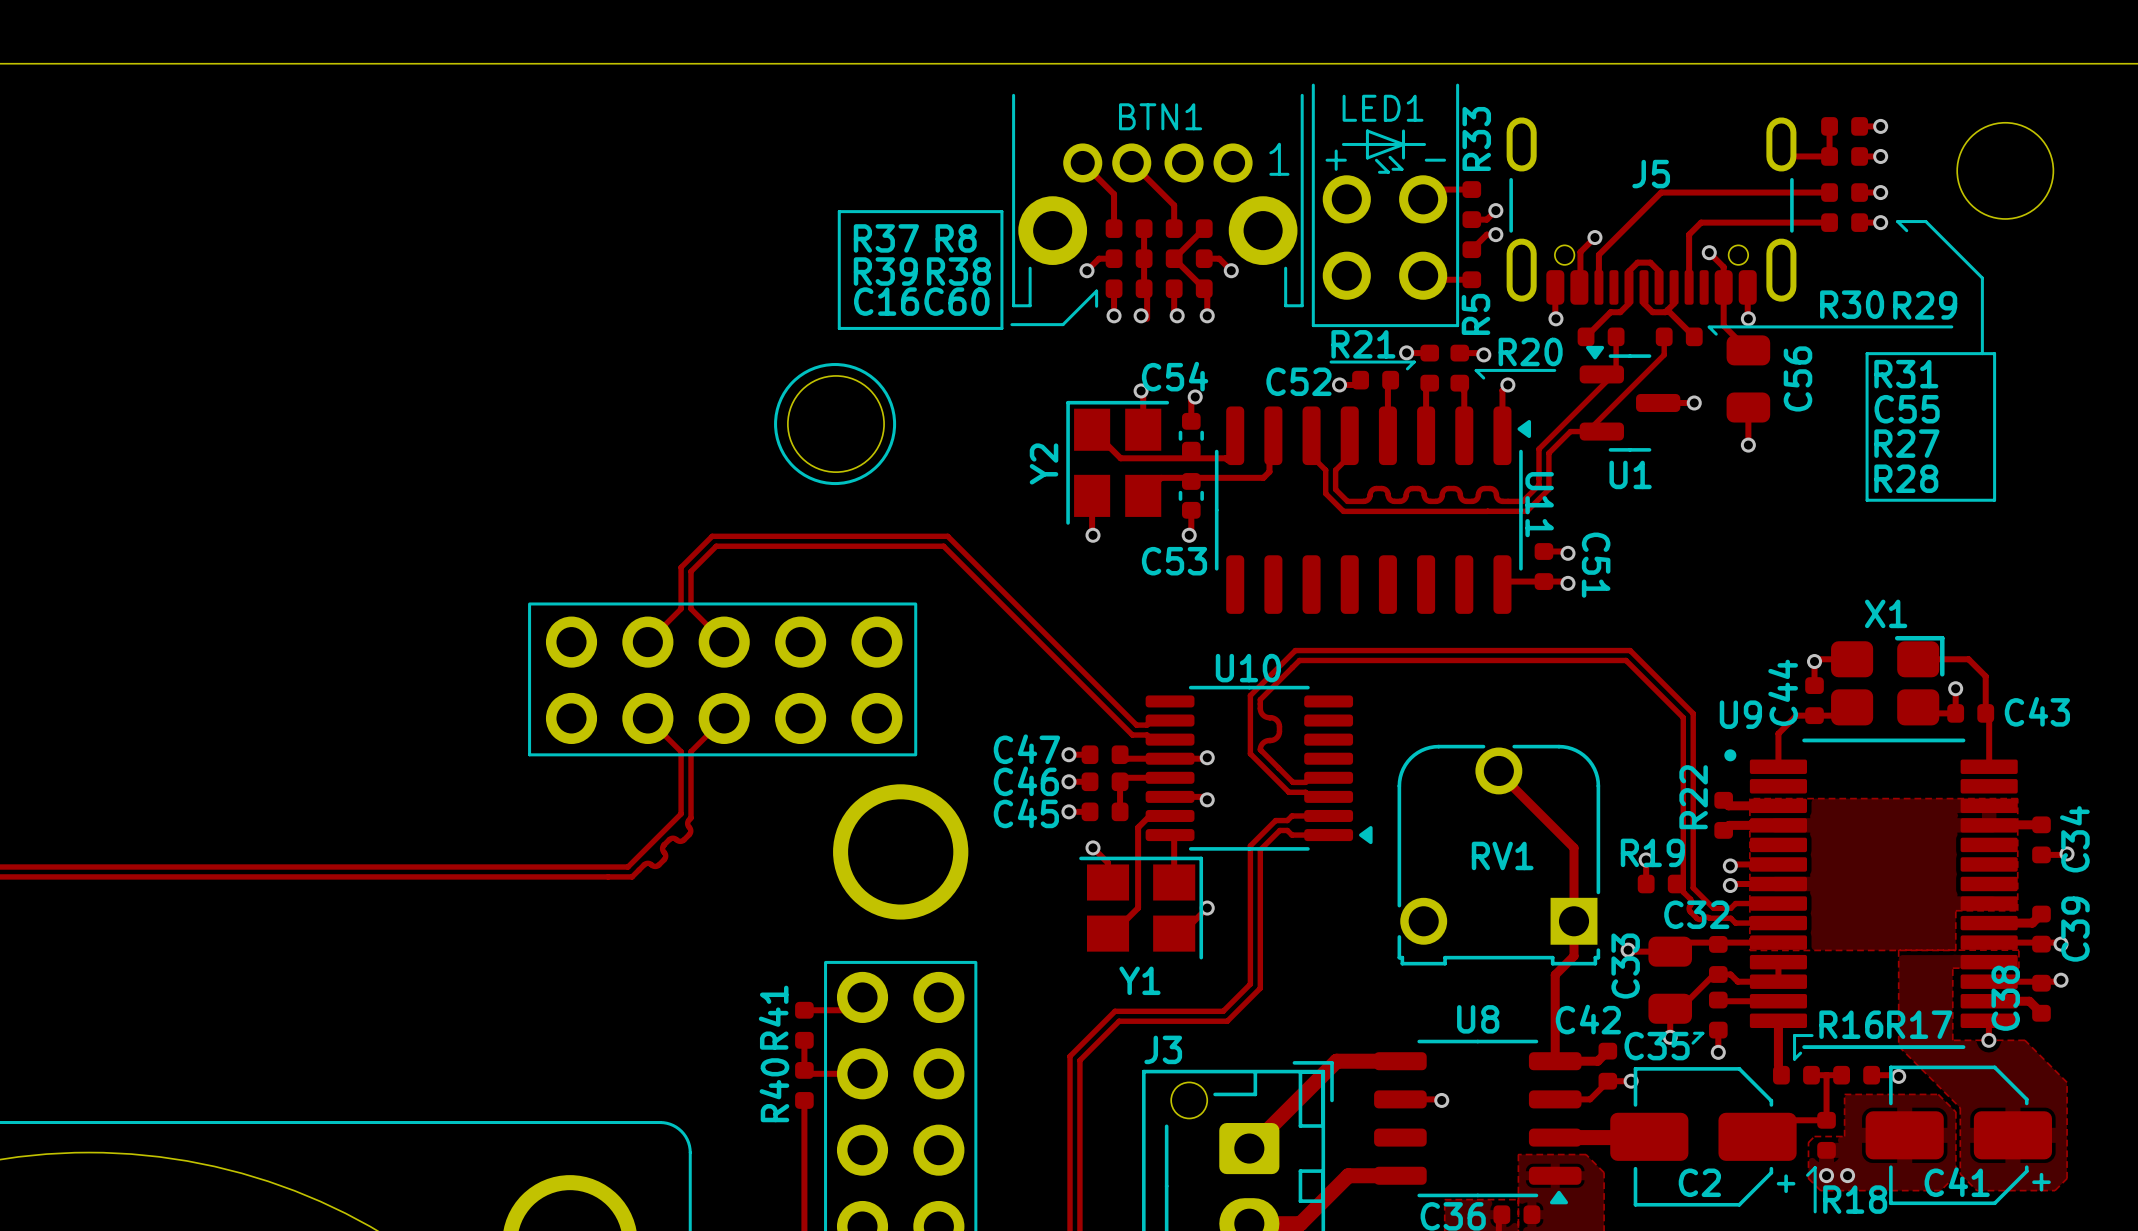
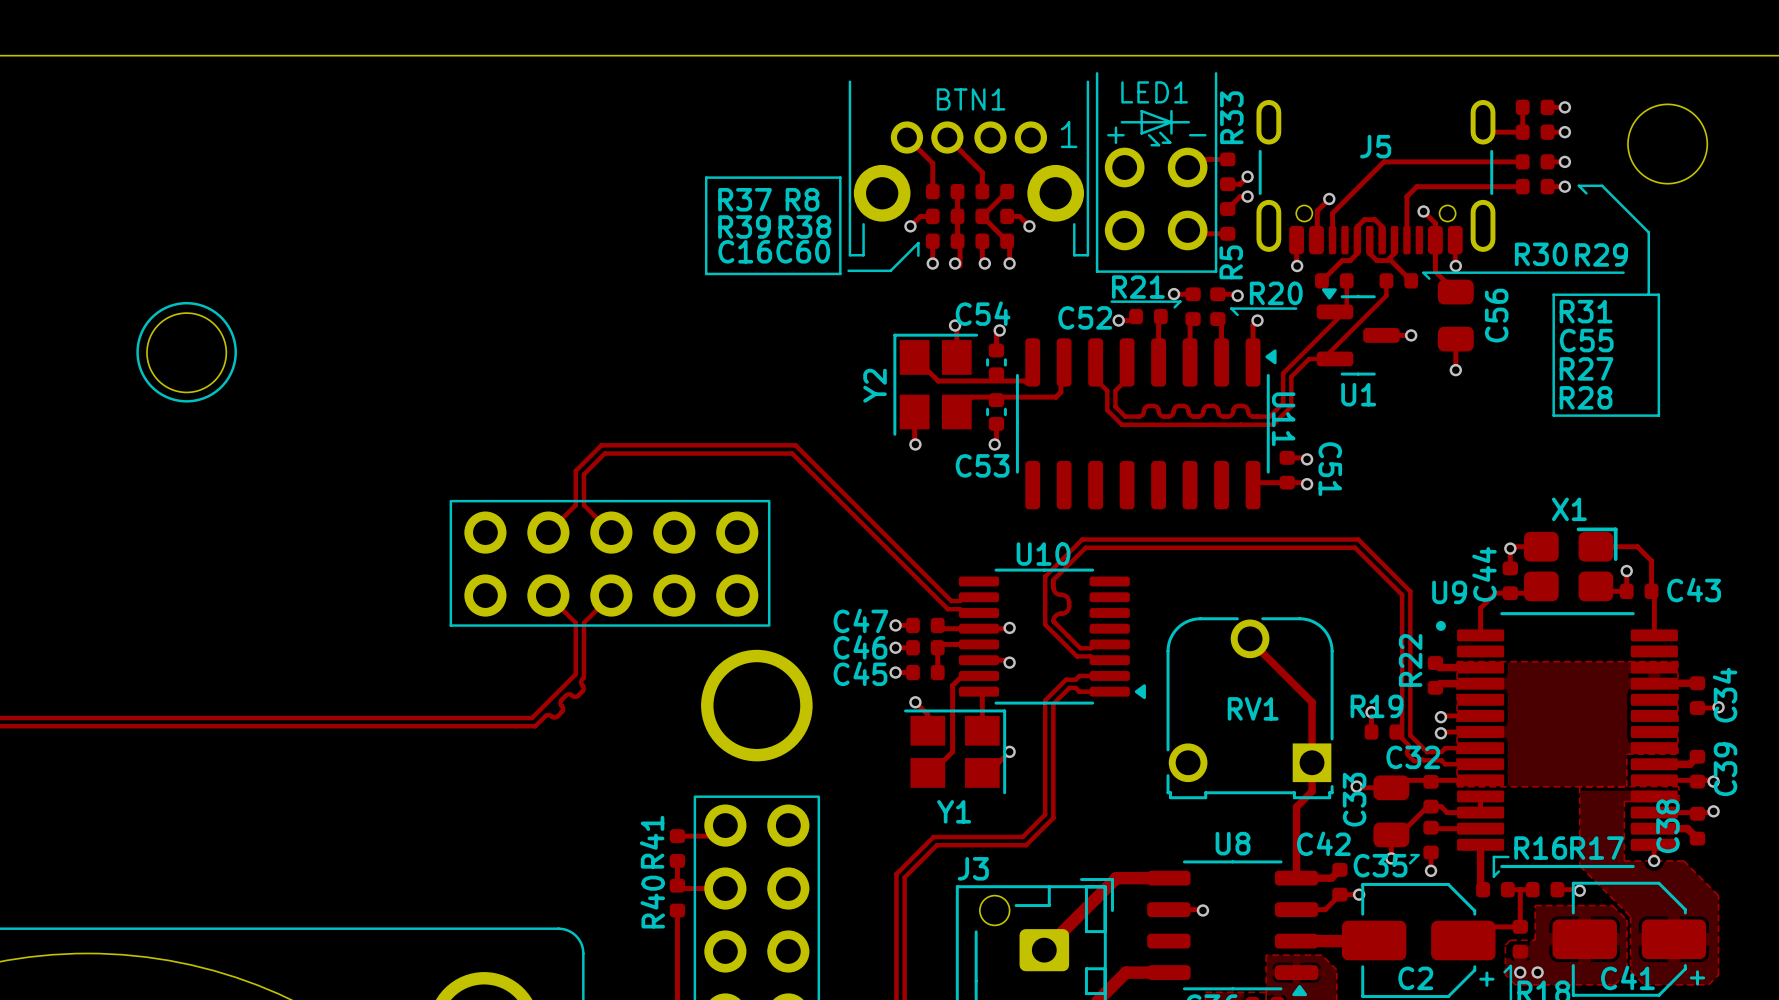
drawing position: (835, 424) -> (186, 352)
round board edge position: (835, 424) -> (186, 352)

